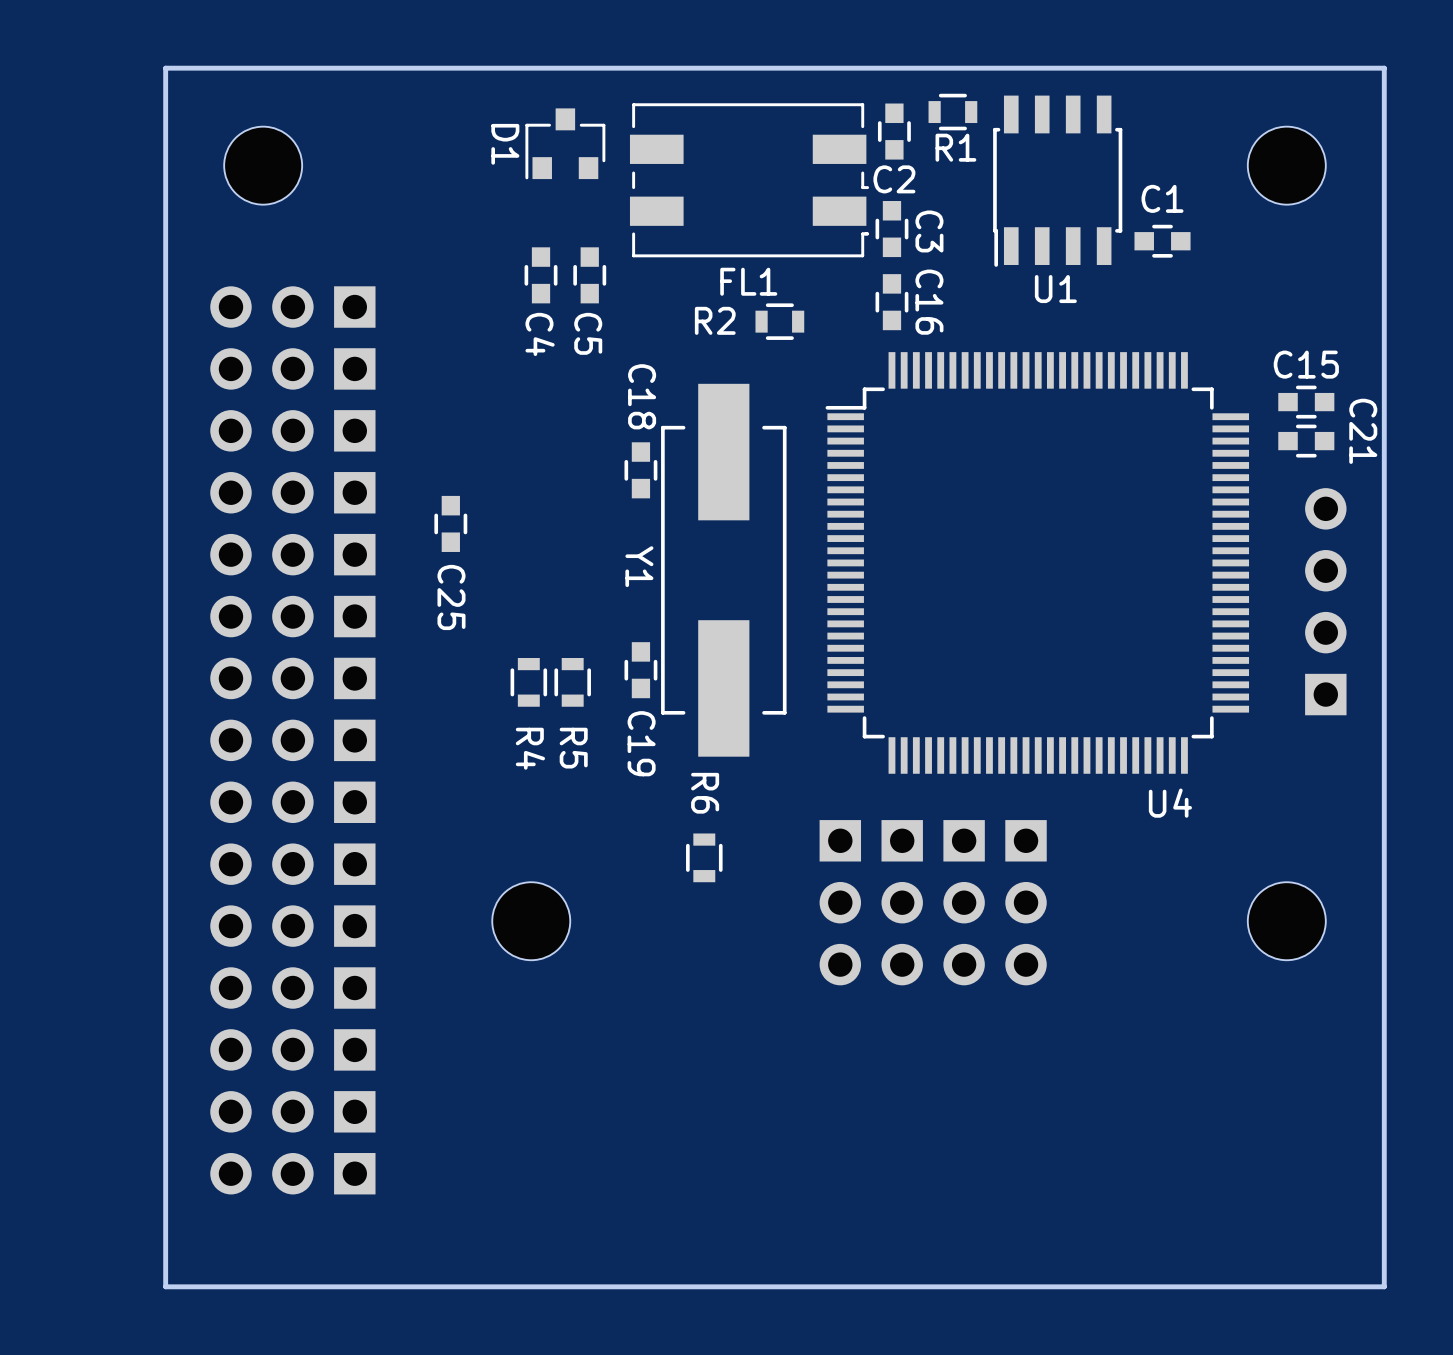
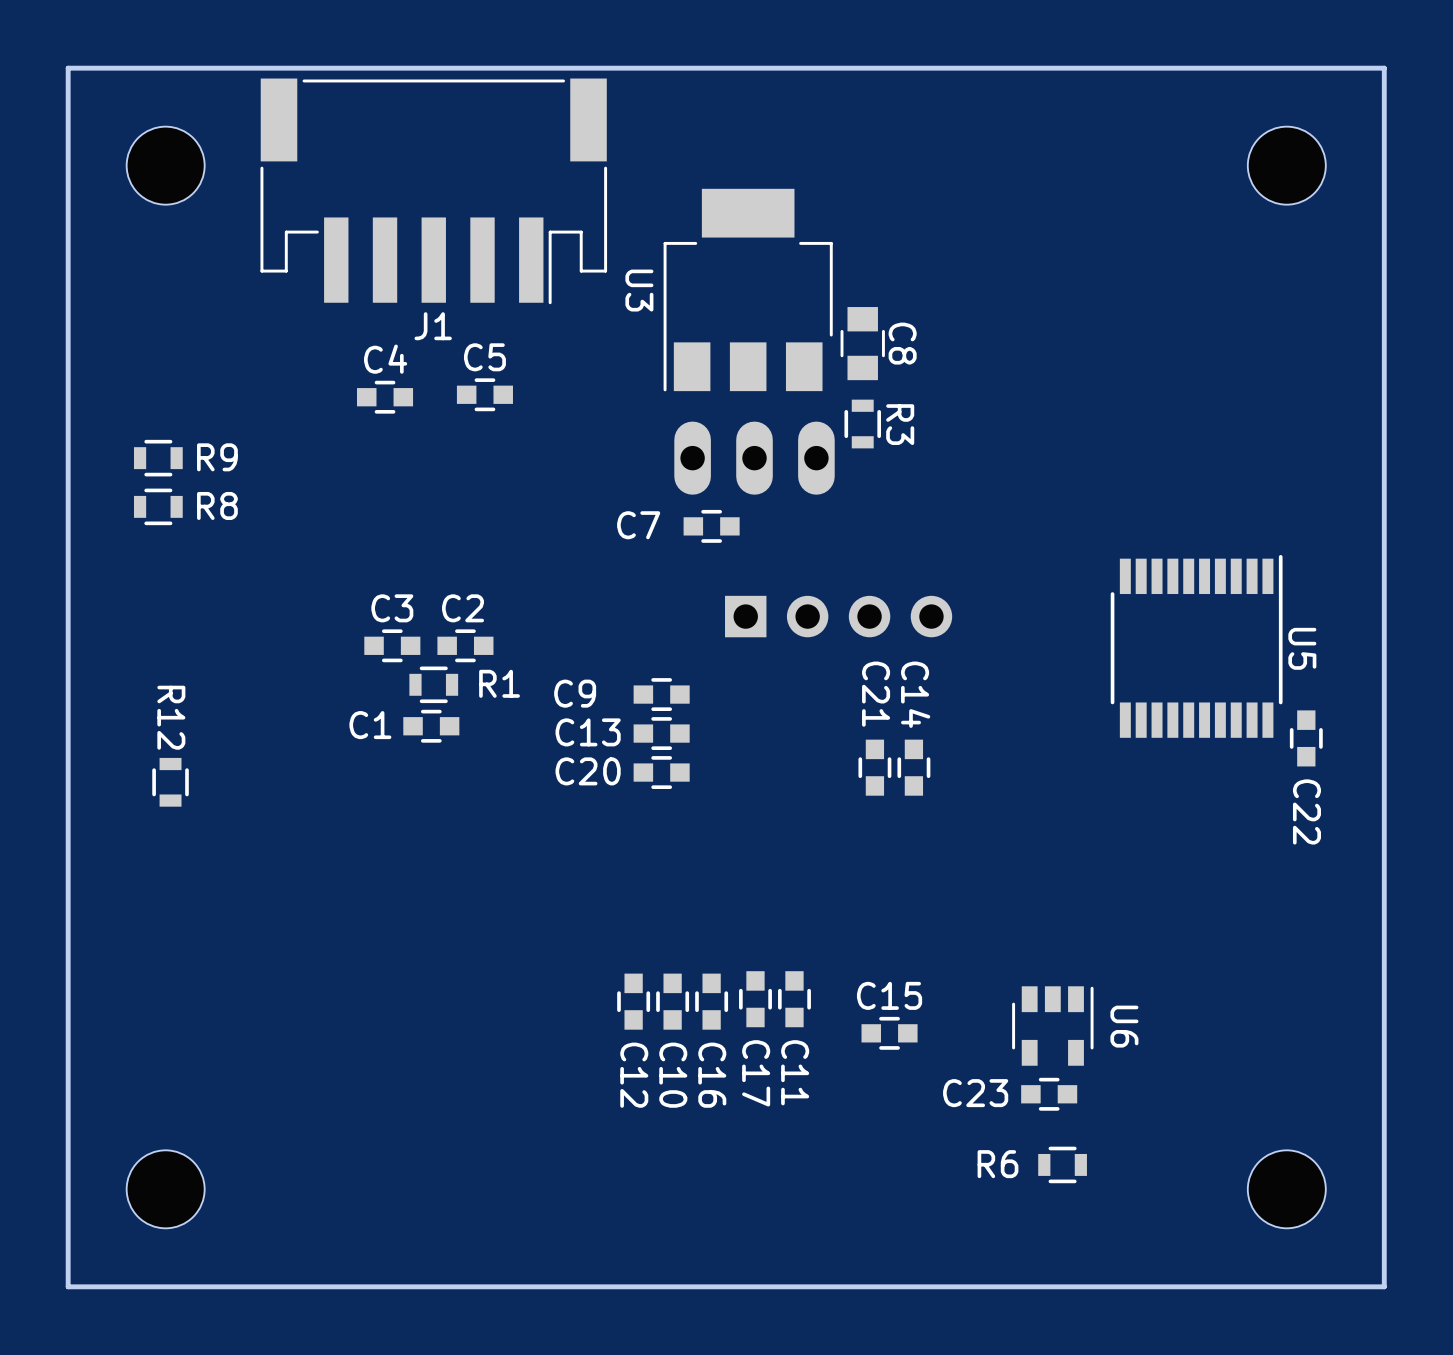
board edge: (165, 68) (165, 1286) -> (165, 68) (68, 68) (68, 1286) (165, 1286)
R1 position: (952, 112) -> (433, 684)
C2 rotation: 0° (894, 131) -> 90° clockwise (465, 645)
C2 position: (894, 131) -> (465, 645)
D1: (565, 143) -> none
R1 name position: R1 (955, 147) -> R1 (499, 683)
part position: (263, 165) -> (165, 165)
C2 name position: C2 (894, 179) -> C2 (463, 608)
FL1: (749, 180) -> none
U1: (1057, 181) -> none
J1: none -> (433, 191)
C1 name position: C1 (1162, 198) -> C1 (370, 725)
C3 rotation: 0° (891, 229) -> 90° clockwise (392, 645)
C3 position: (891, 229) -> (392, 645)
C3 name position: C3 (929, 231) -> C3 (392, 608)
C1 position: (1162, 241) -> (431, 726)
C4 rotation: 0° (541, 275) -> 90° clockwise (385, 397)
C4 position: (541, 275) -> (385, 397)
C5 rotation: 0° (589, 275) -> 90° clockwise (484, 394)
C5 position: (589, 275) -> (484, 394)
U3: none -> (748, 290)
C16 position: (891, 302) -> (711, 1001)
C16 name position: C16 (929, 302) -> C16 (712, 1075)
part: (292, 307) -> none
R2: (779, 321) -> none
C5 name position: C5 (588, 333) -> C5 (484, 357)
C4 name position: C4 (540, 334) -> C4 (385, 359)
C8: none -> (862, 343)
part: (292, 368) -> none
C15 position: (1306, 402) -> (889, 1033)
R3: none -> (862, 424)
part: (292, 430) -> none
C21 name position: C21 (1363, 431) -> C21 (876, 694)
C21 rotation: 0° (1306, 441) -> 90° clockwise (874, 767)
C21 position: (1306, 441) -> (874, 767)
R9: none -> (158, 458)
part: none -> (754, 458)
C18: (640, 470) -> none
part: (292, 492) -> none
R8: none -> (158, 506)
C25: (450, 523) -> none
C7: none -> (711, 526)
part: (292, 554) -> none
U4: (1037, 562) -> none
Y1: (723, 570) -> none
part rotation: 0° (1325, 601) -> 90° clockwise (838, 616)
part position: (1325, 601) -> (838, 616)
part: (292, 616) -> none
U5: none -> (1196, 646)
C19: (640, 670) -> none
part: (292, 678) -> none
R4: (528, 682) -> none
R5: (572, 682) -> none
C9: none -> (661, 694)
C13: none -> (661, 733)
C22: none -> (1306, 738)
part: (292, 740) -> none
C14: none -> (913, 767)
C20: none -> (661, 772)
R12: none -> (170, 782)
R6 name position: R6 (705, 793) -> R6 (997, 1164)
part: (292, 802) -> none
R6 rotation: 0° (704, 857) -> 90° clockwise (1062, 1164)
R6 position: (704, 857) -> (1062, 1164)
part: (292, 864) -> none
part: (840, 902) -> none
part: (902, 902) -> none
part: (964, 902) -> none
part: (1026, 902) -> none
part: (531, 921) -> none
part position: (1286, 921) -> (1286, 1189)
part: (292, 926) -> none
part: (292, 988) -> none
C17: none -> (755, 999)
C11: none -> (794, 999)
C12: none -> (633, 1001)
C10: none -> (672, 1001)
U6: none -> (1052, 1026)
part: (292, 1049) -> none
C23: none -> (1049, 1094)
part: (292, 1111) -> none
part: (292, 1173) -> none
part: none -> (165, 1189)

